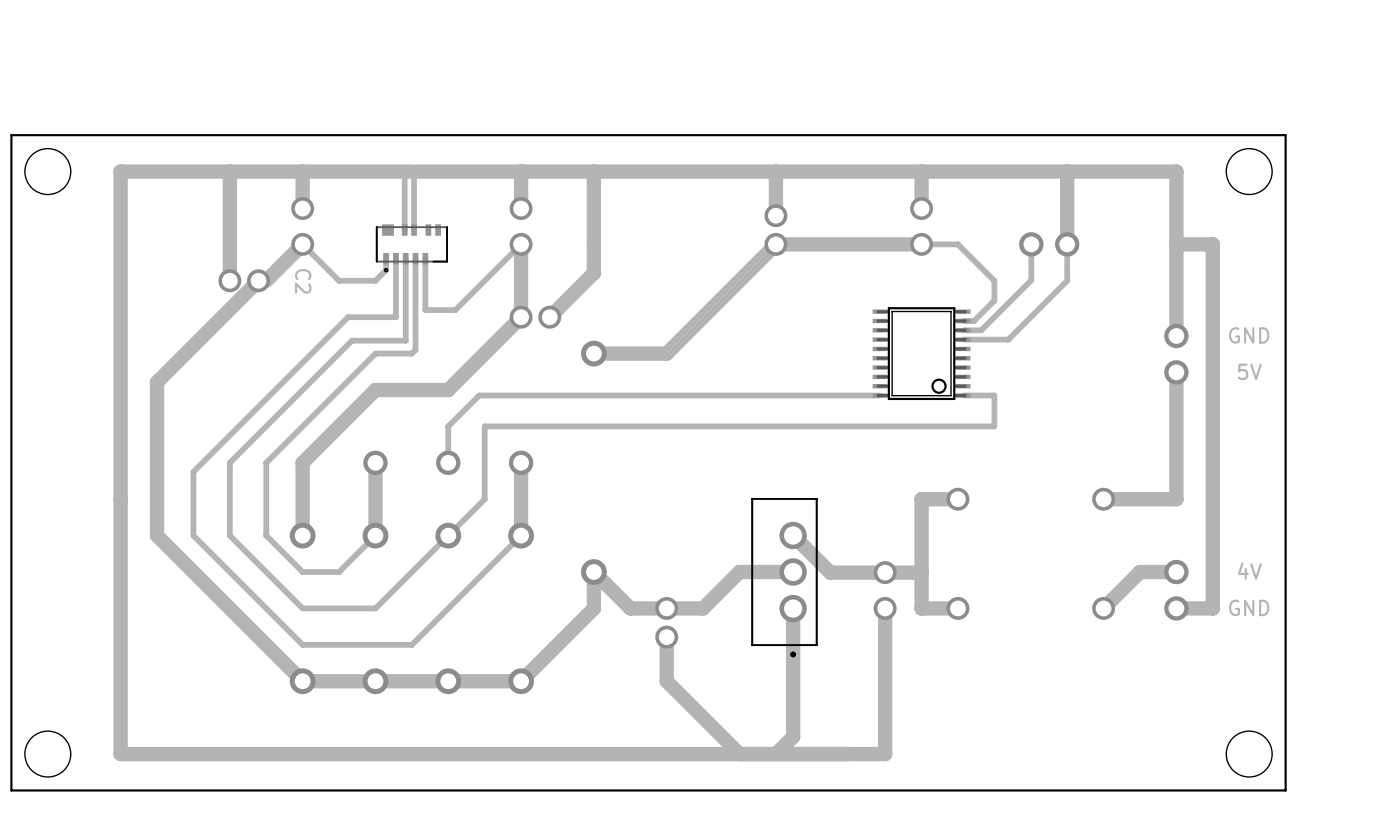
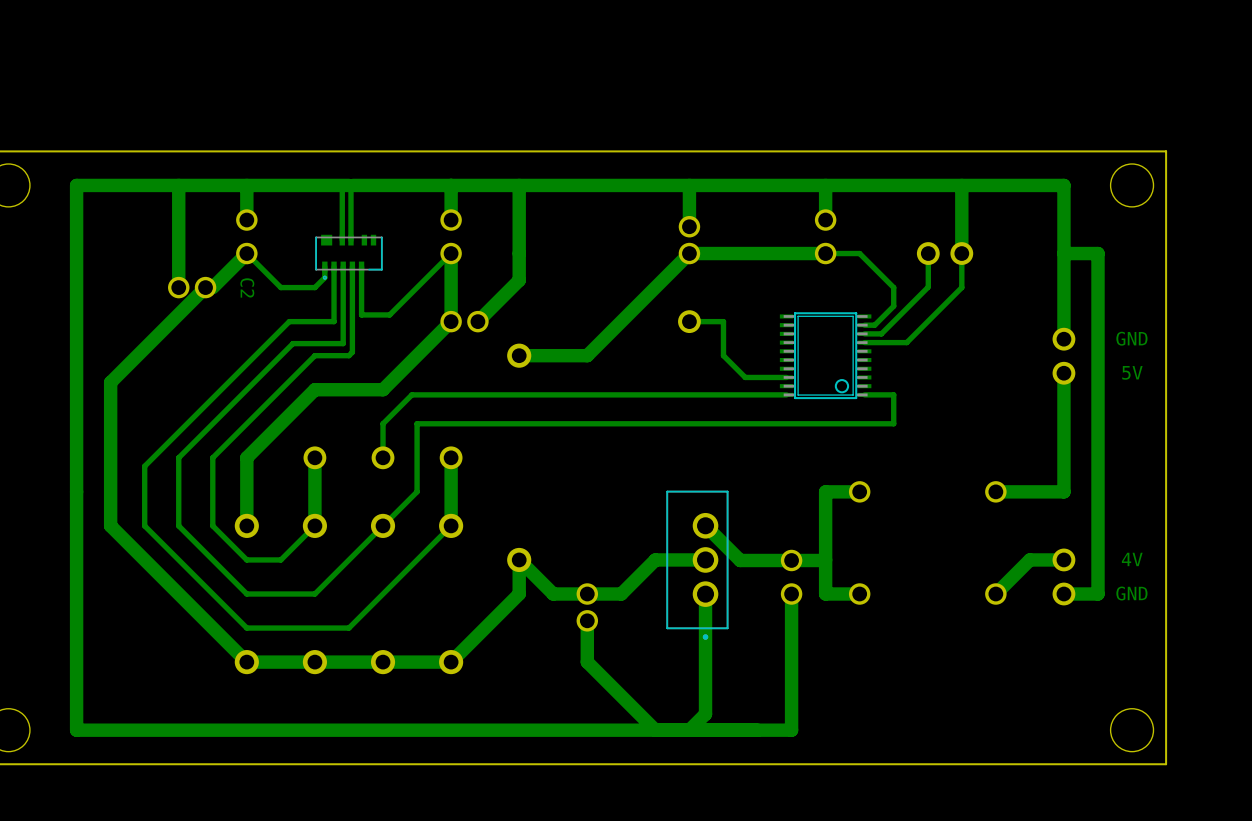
track: none -> (689, 321) (723, 321) (723, 355) (745, 377) (786, 377)
part: none -> (689, 321)

